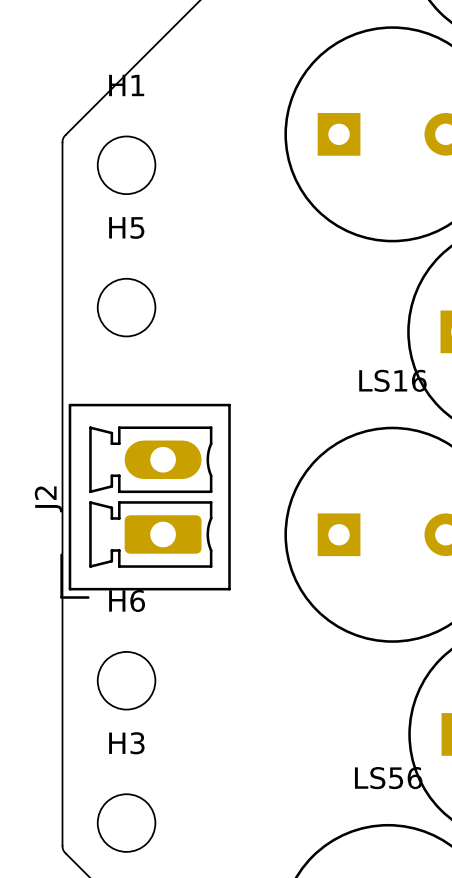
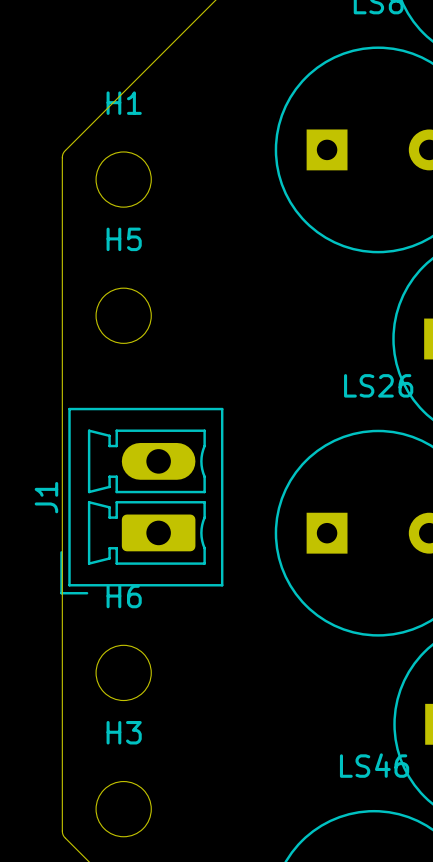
LS16 name: LS16 (392, 380) -> LS26 (378, 385)
J2 name: J2 (48, 499) -> J1 (46, 497)
LS56 name: LS56 (388, 778) -> LS46 (374, 765)

